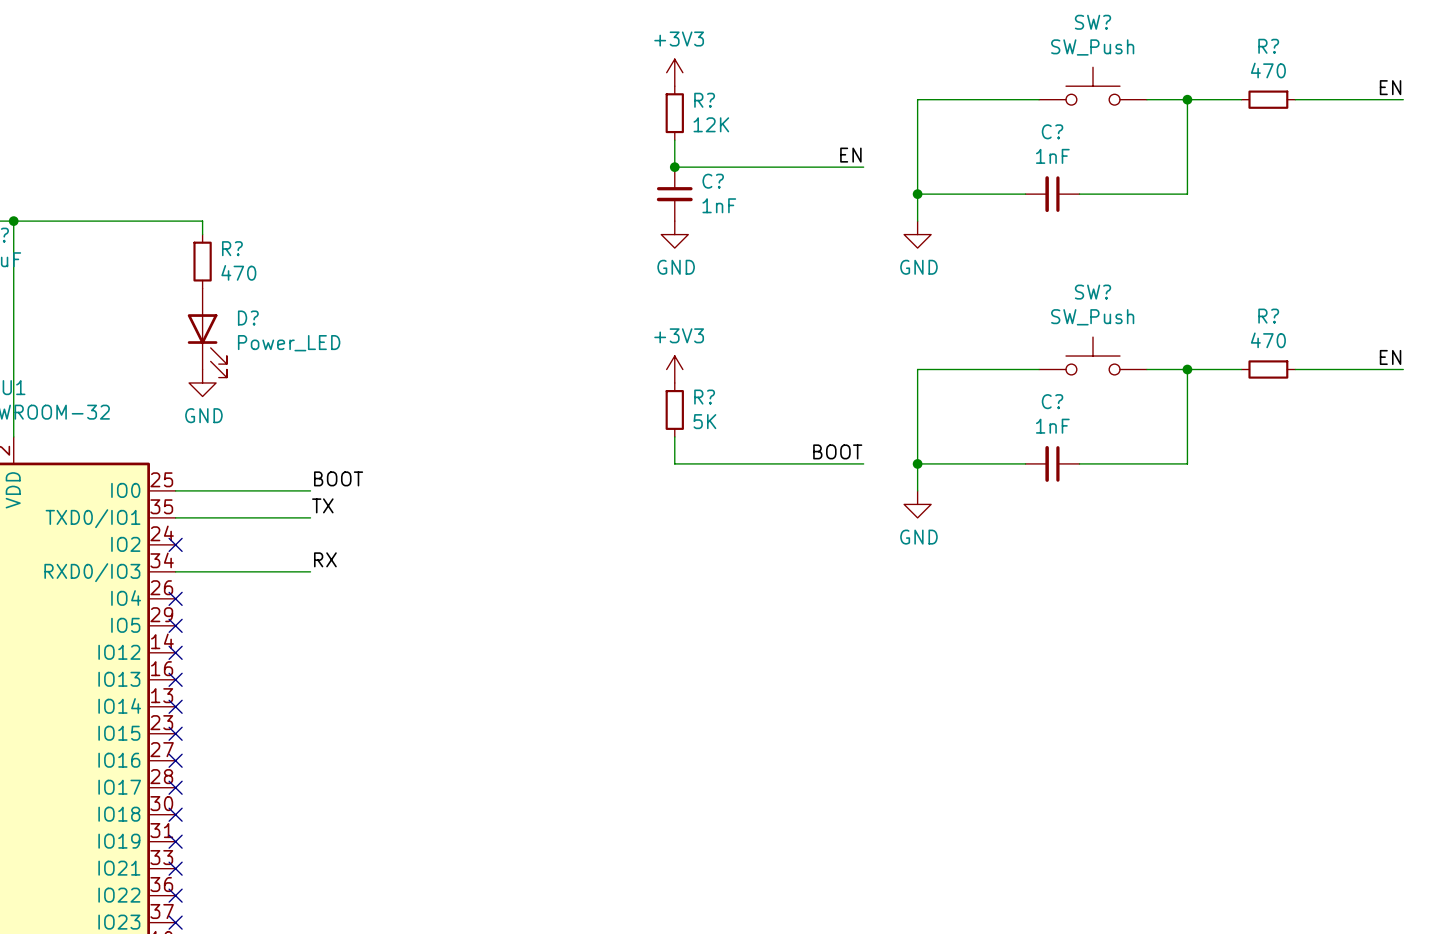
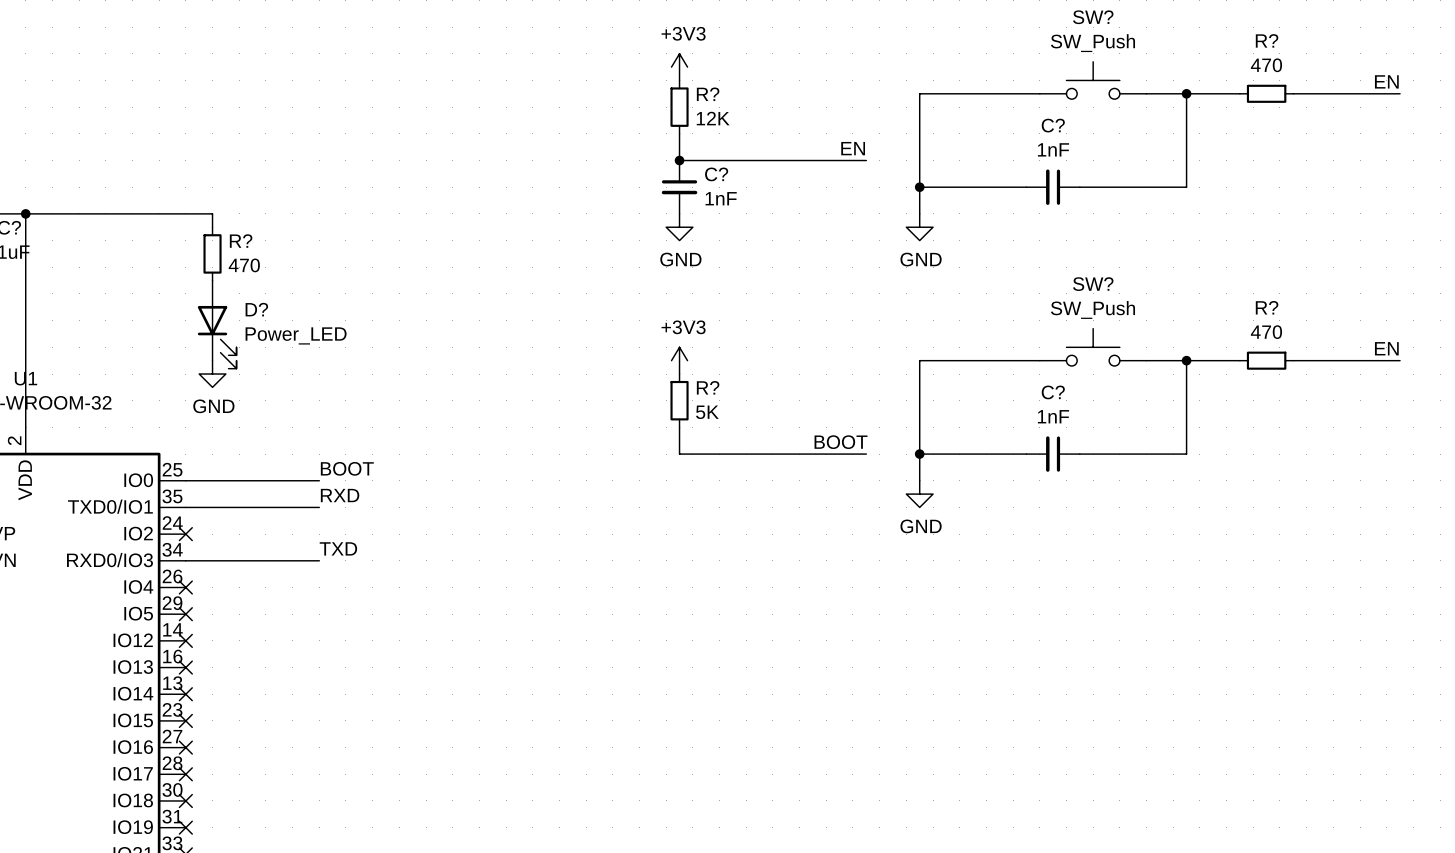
label: TX (322, 505) -> RXD (340, 495)
label: RX (325, 559) -> TXD (338, 548)

